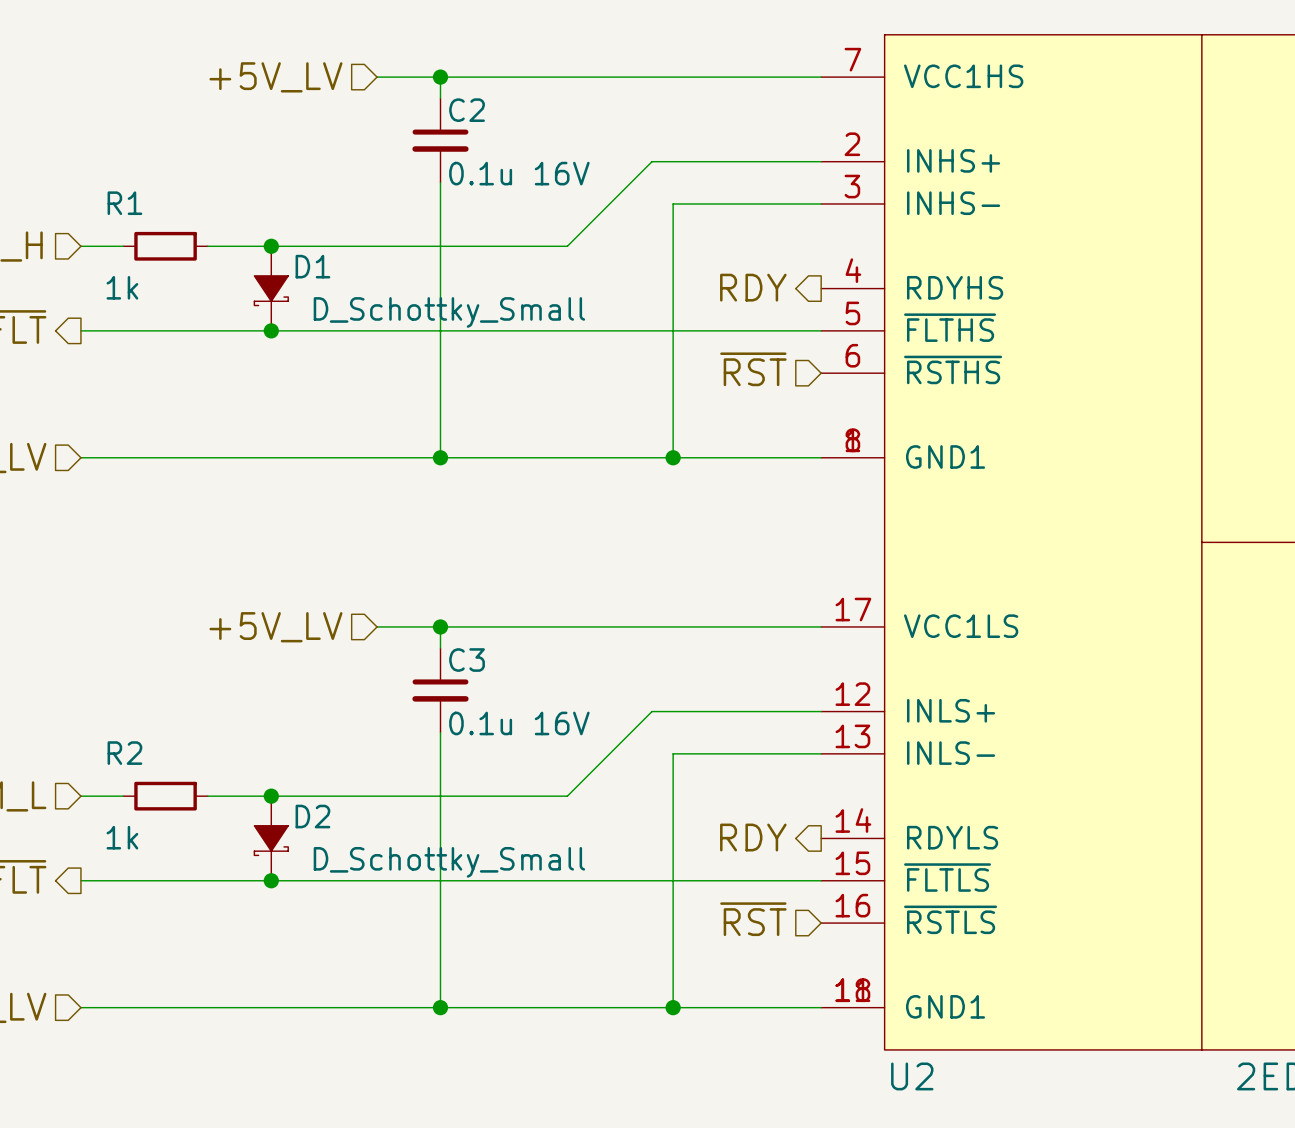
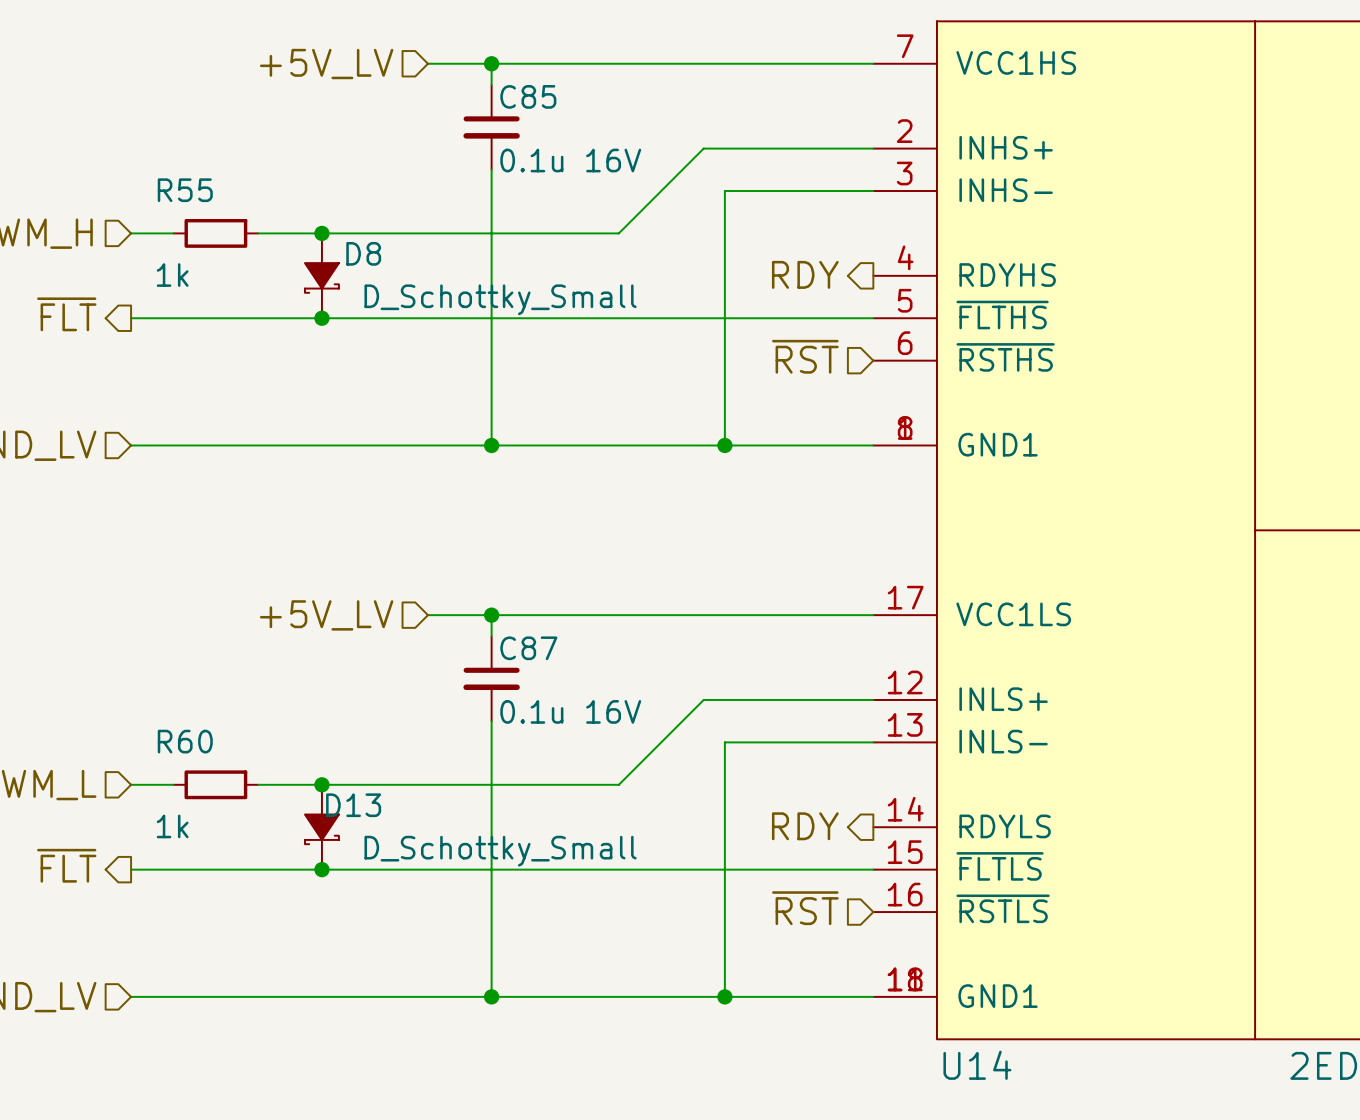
C2 name: C2 (467, 110) -> C85 (528, 96)
R1 name: R1 (124, 203) -> R55 (185, 190)
D1 name: D1 (312, 266) -> D8 (363, 253)
C3 name: C3 (467, 660) -> C87 (528, 648)
R2 name: R2 (124, 753) -> R60 (185, 741)
D2 name: D2 (312, 816) -> D13 (353, 805)
U2 name: U2 (912, 1076) -> U14 (977, 1065)

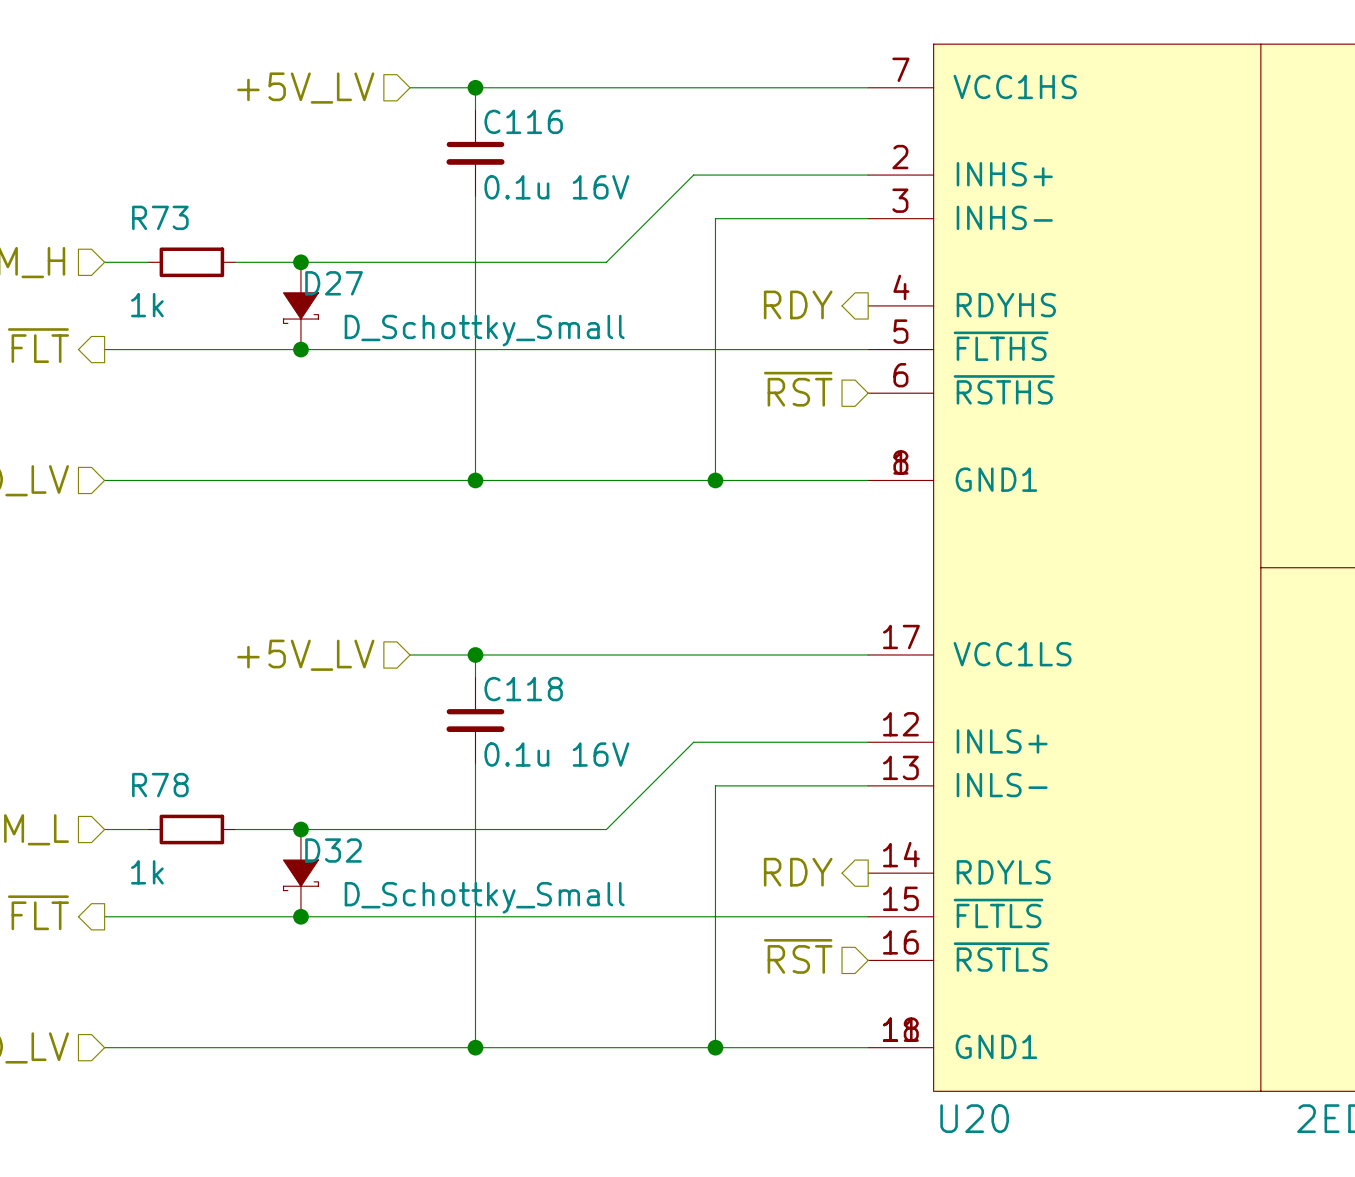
C85 name: C85 (528, 96) -> C116 (523, 121)
R55 name: R55 (185, 190) -> R73 (160, 217)
D8 name: D8 (363, 253) -> D27 (334, 283)
C87 name: C87 (528, 648) -> C118 (523, 689)
R60 name: R60 (185, 741) -> R78 (160, 785)
D13 name: D13 (353, 805) -> D32 (333, 850)
U14 name: U14 (977, 1065) -> U20 (974, 1118)

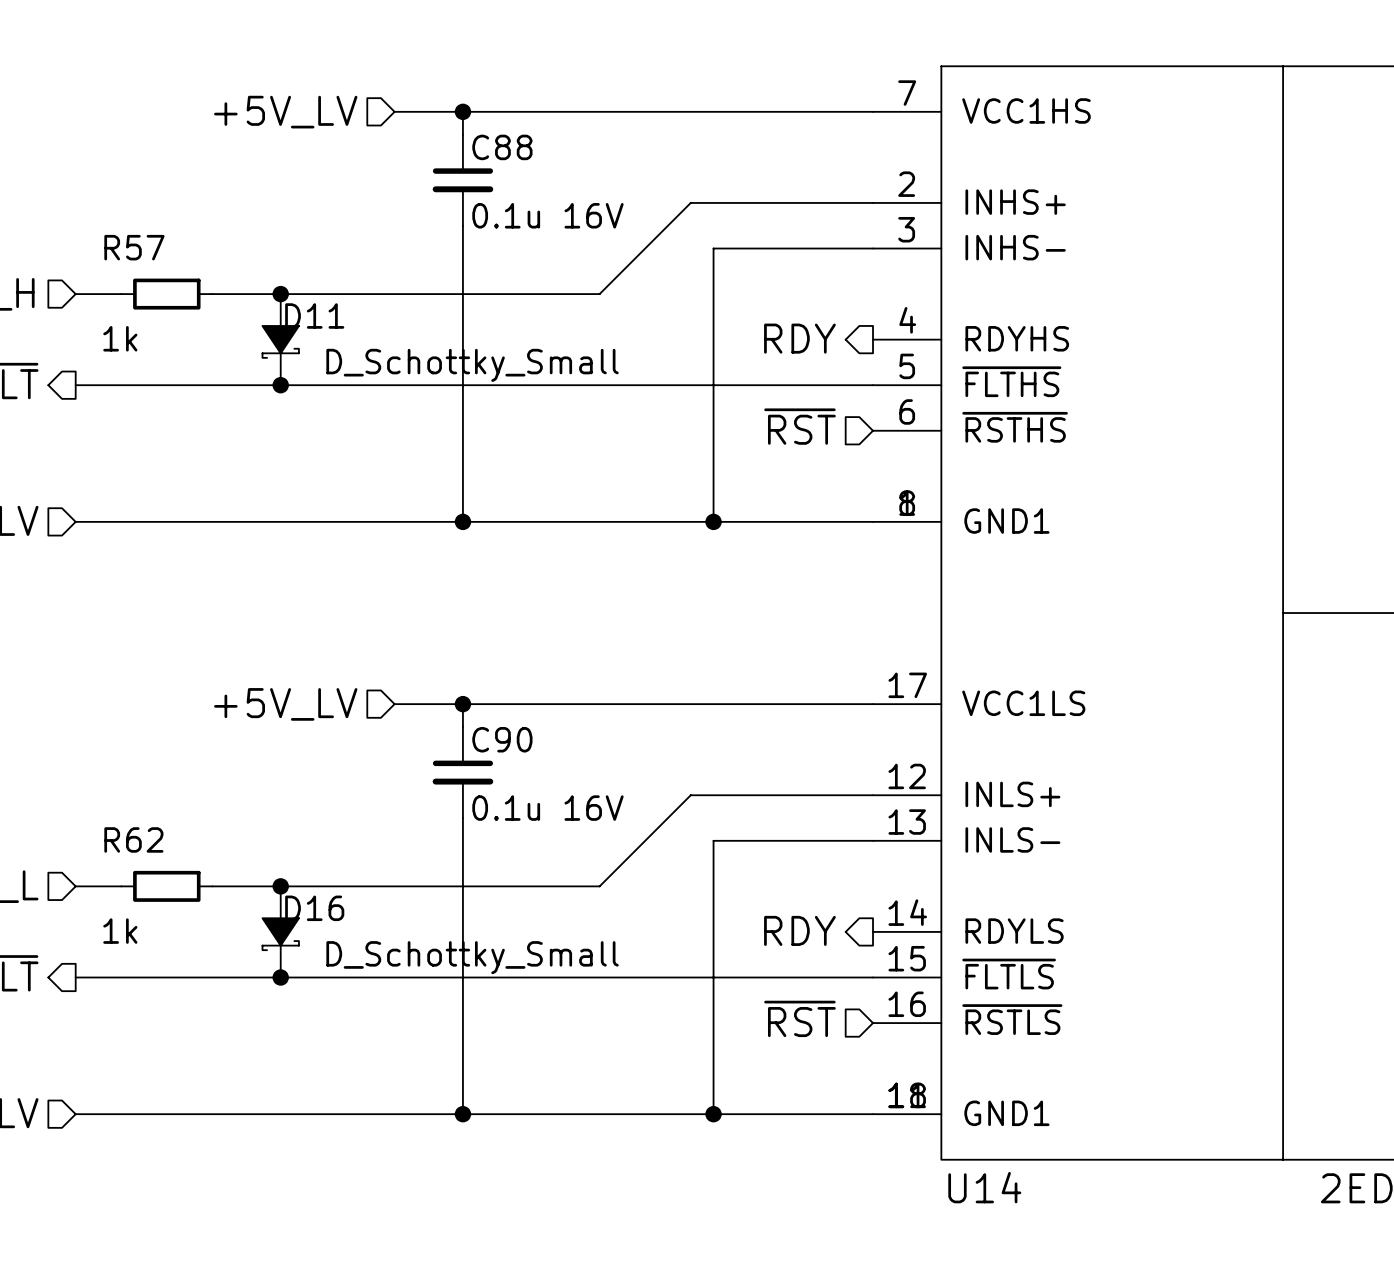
C116 name: C116 (523, 121) -> C88 (502, 147)
R73 name: R73 (160, 217) -> R57 (134, 247)
D27 name: D27 (334, 283) -> D11 (314, 316)
C118 name: C118 (523, 689) -> C90 (502, 739)
R78 name: R78 (160, 785) -> R62 (133, 839)
D32 name: D32 (333, 850) -> D16 (314, 908)
U20 name: U20 (974, 1118) -> U14 (984, 1187)

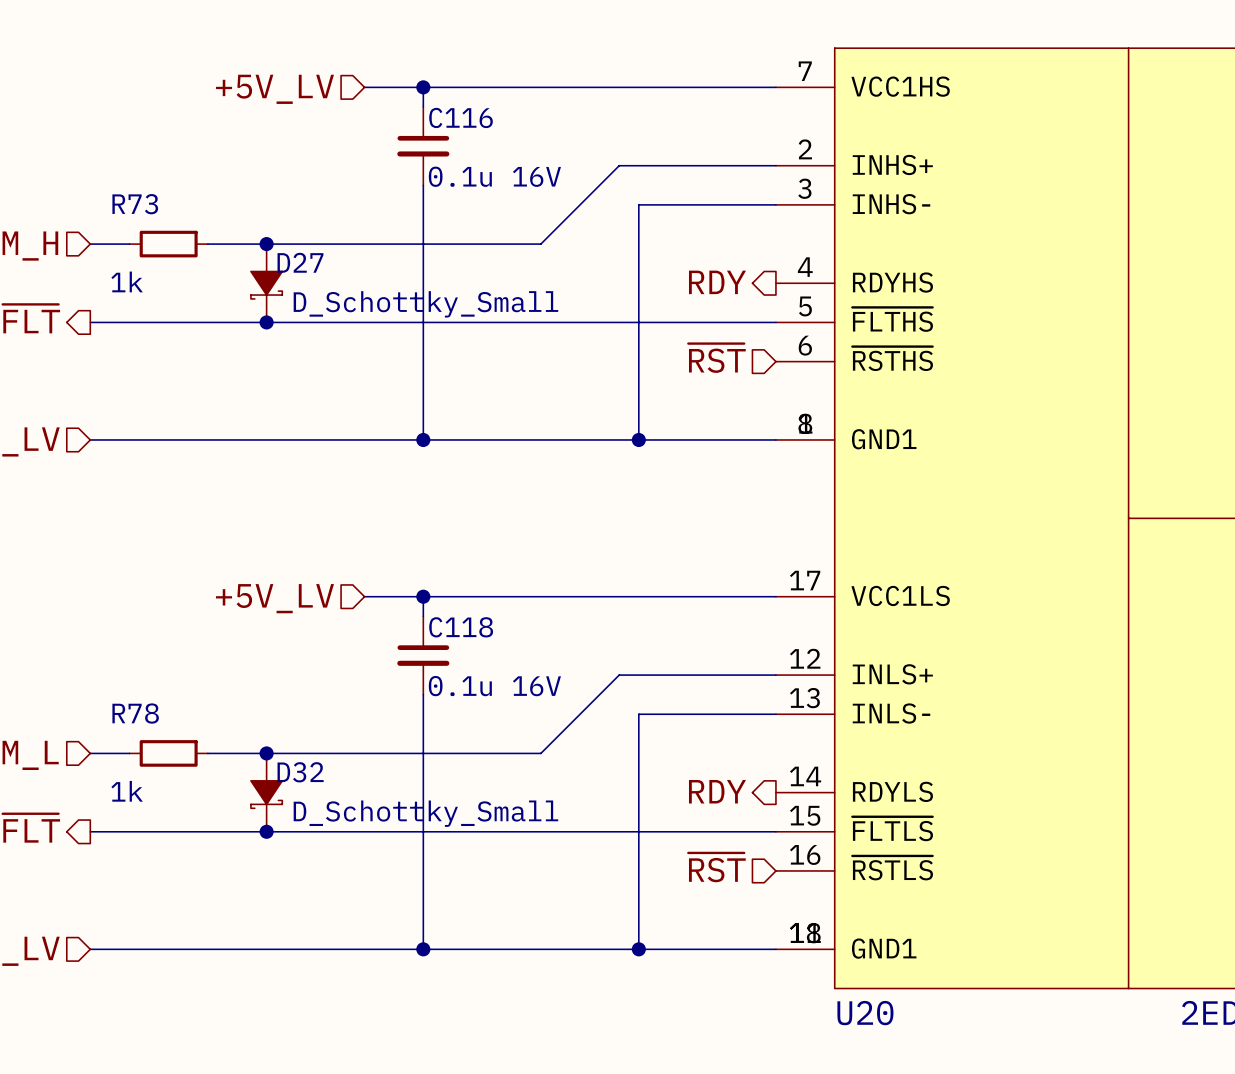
C88 name: C88 (502, 147) -> C116 (461, 117)
R57 name: R57 (134, 247) -> R73 (135, 204)
D11 name: D11 (314, 316) -> D27 (300, 262)
C90 name: C90 (502, 739) -> C118 (461, 627)
R62 name: R62 (133, 839) -> R78 (135, 713)
D16 name: D16 (314, 908) -> D32 (300, 772)
U14 name: U14 (984, 1187) -> U20 (865, 1013)

